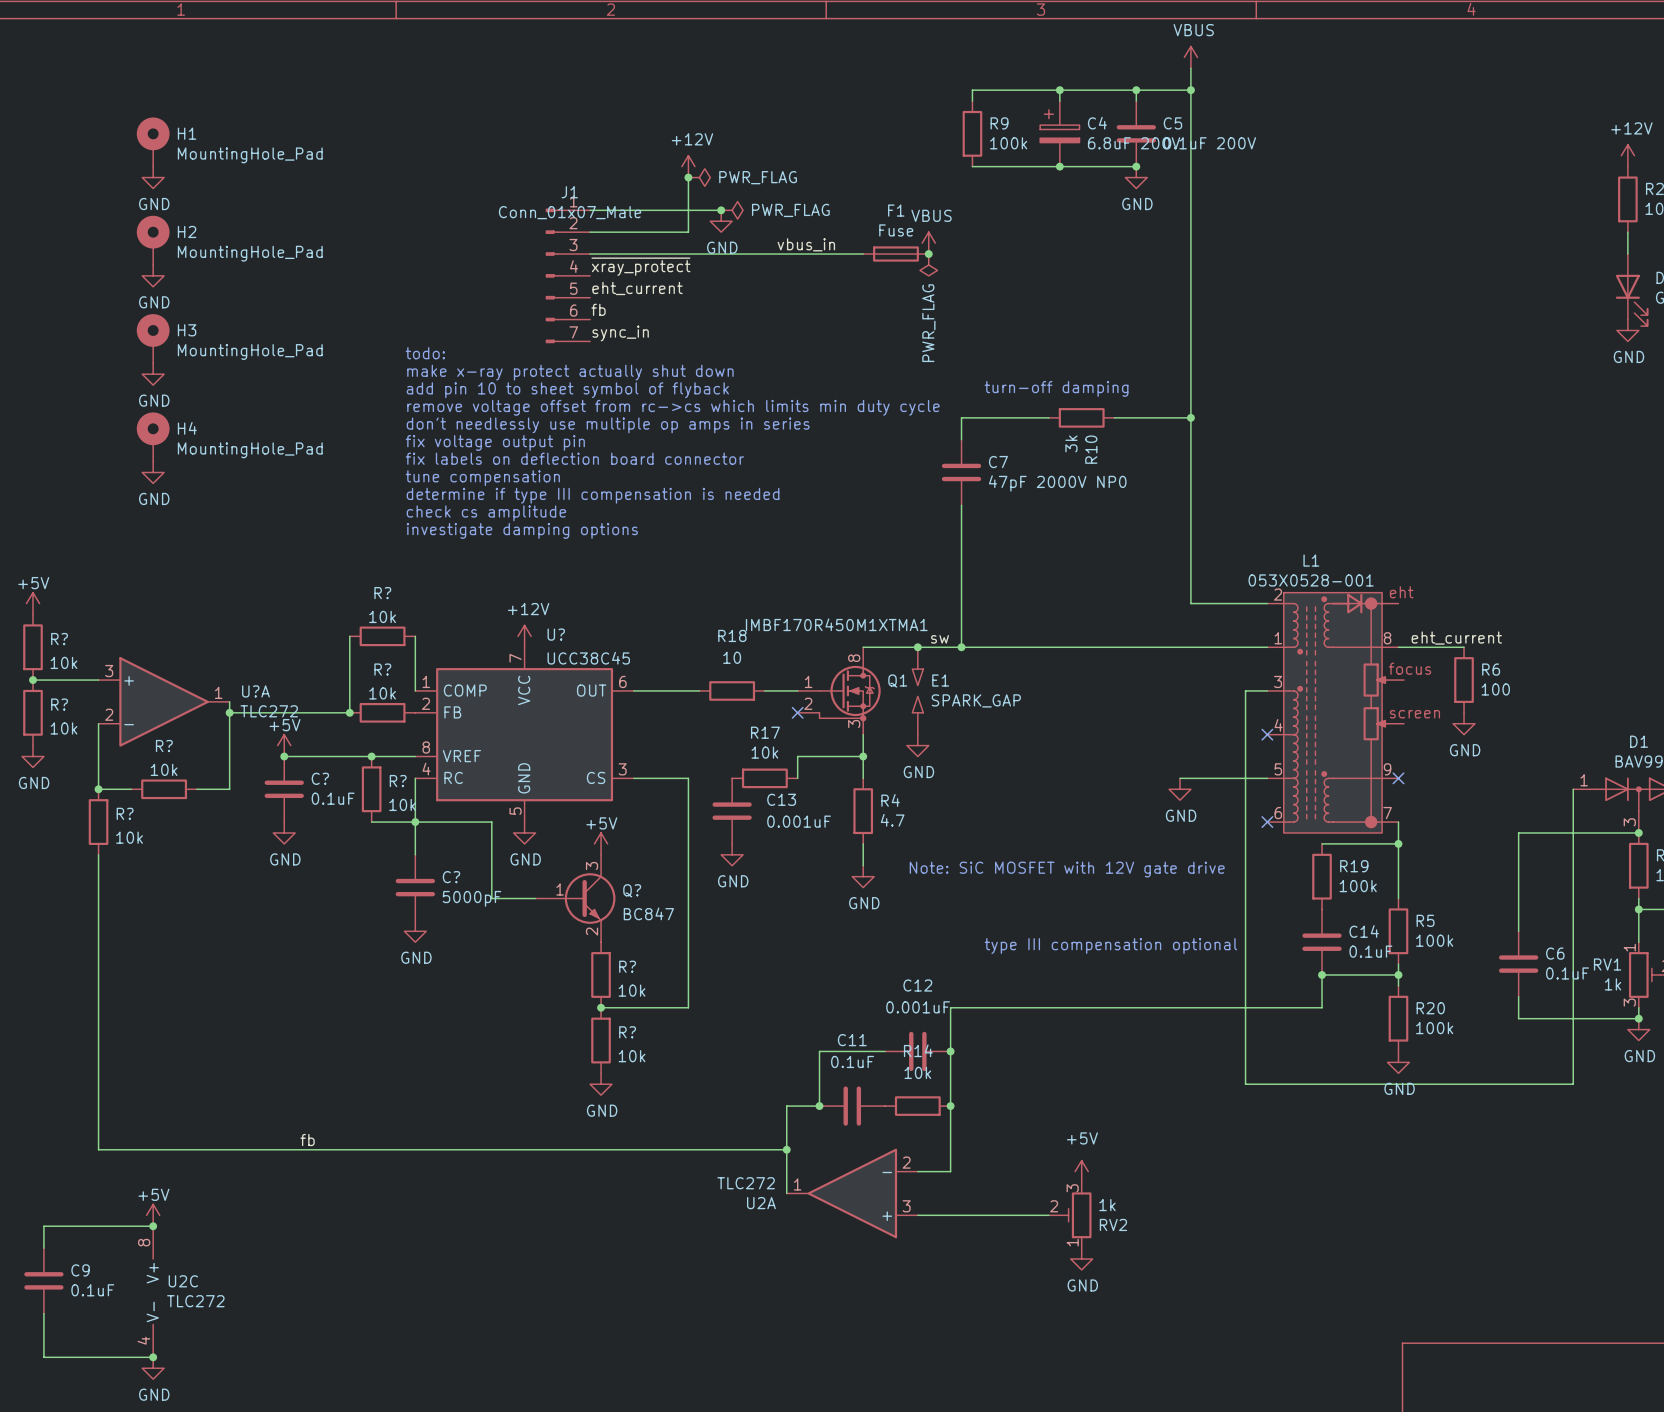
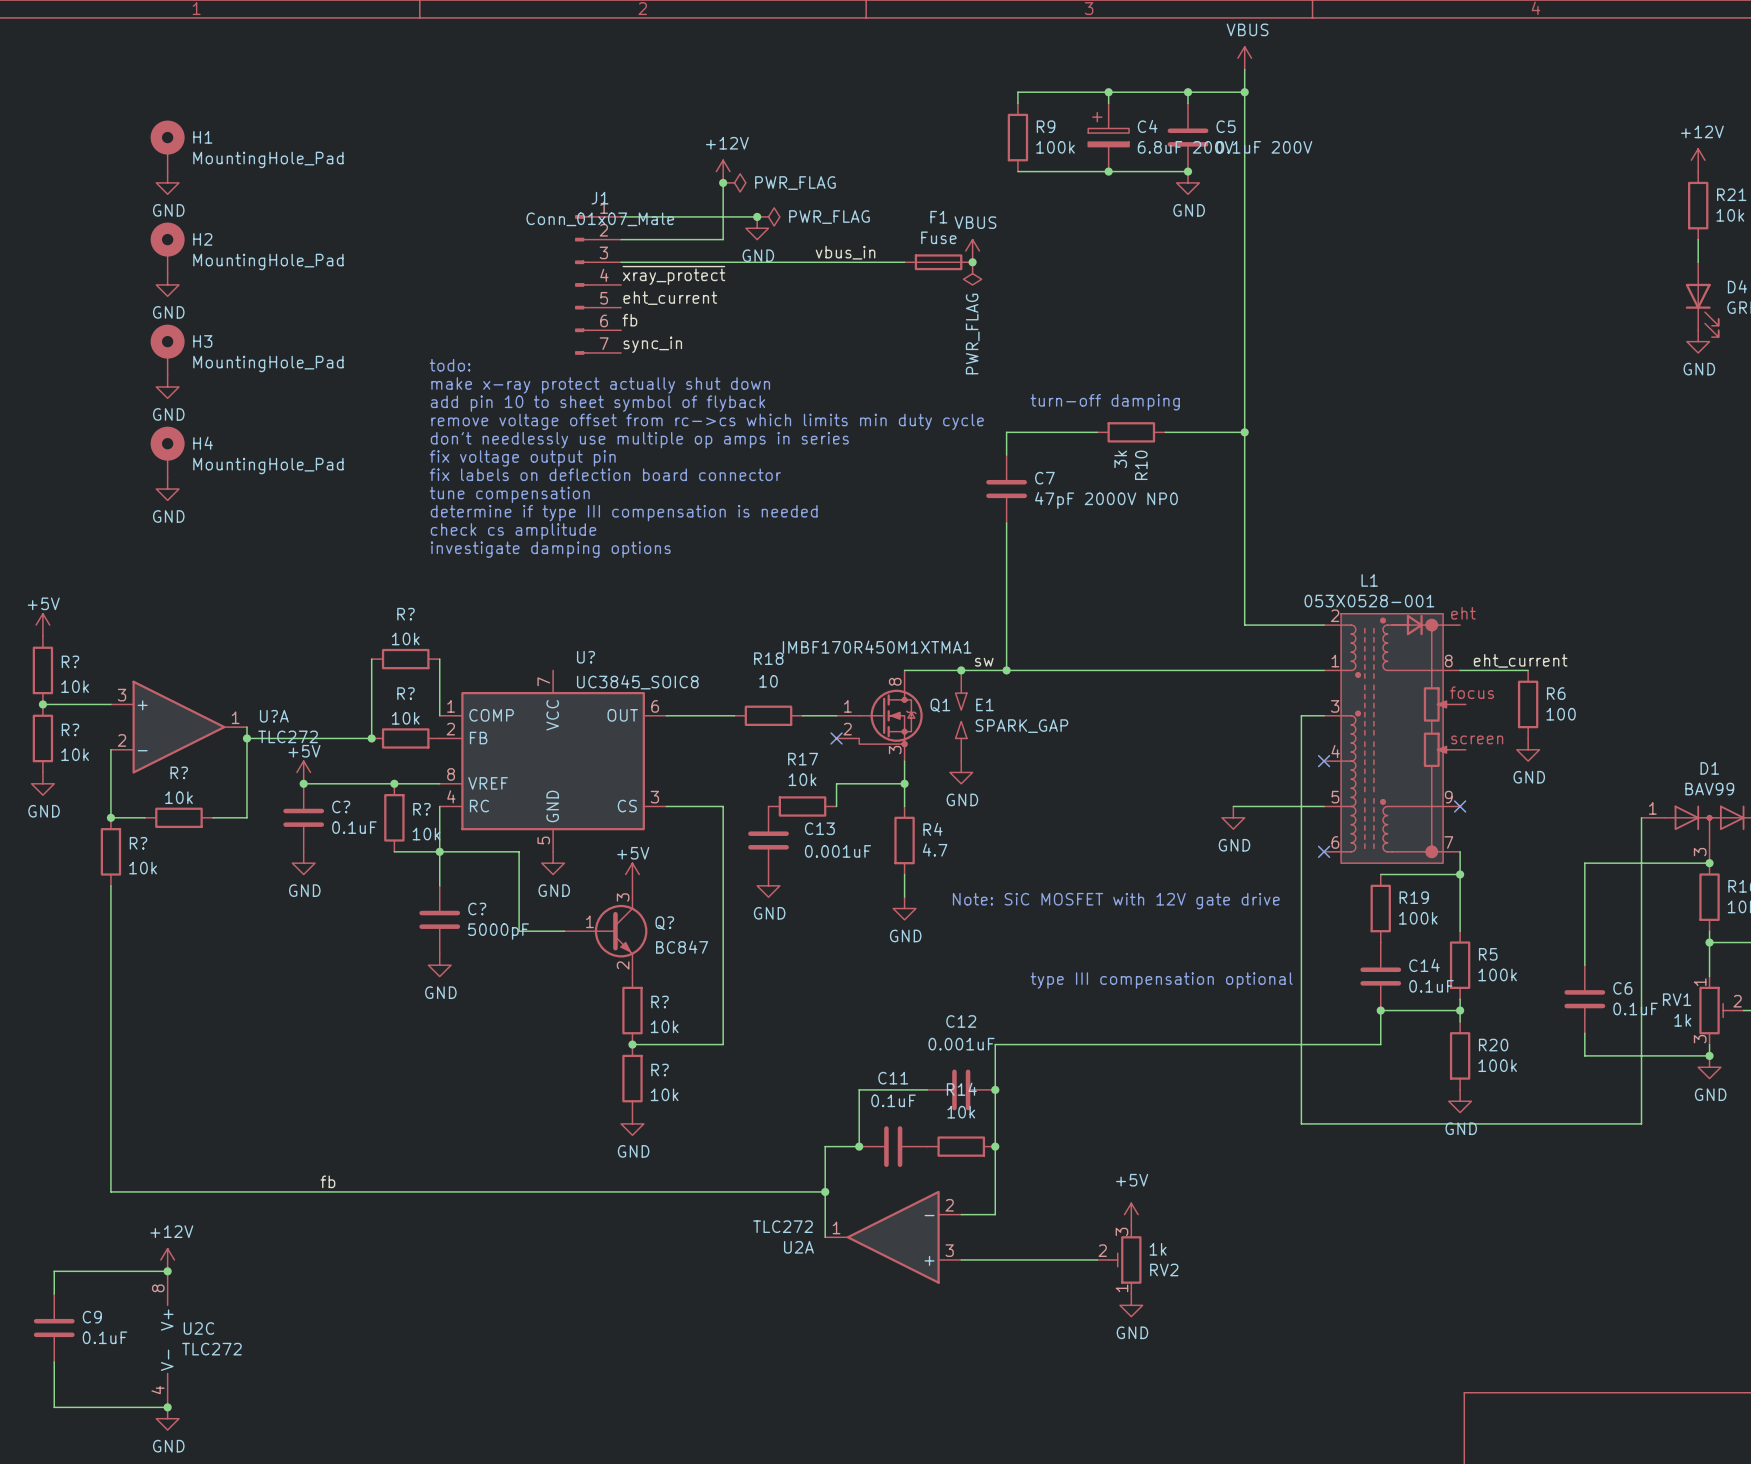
power symbol: +12V (524, 636) -> none
U? value: UCC38C45 (588, 658) -> UC3845_SOIC8 (637, 682)
power symbol: +5V (153, 1215) -> +12V (167, 1259)

